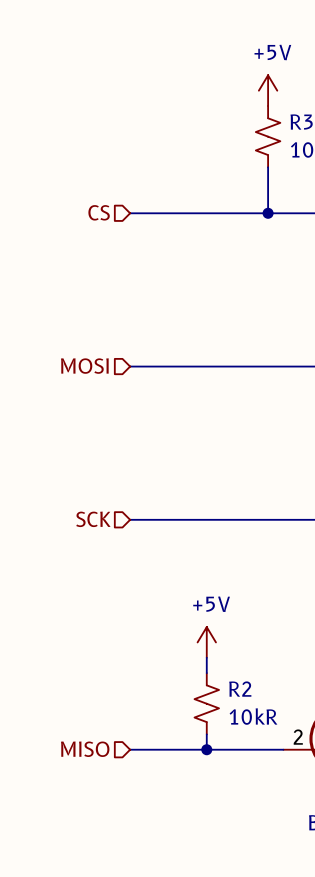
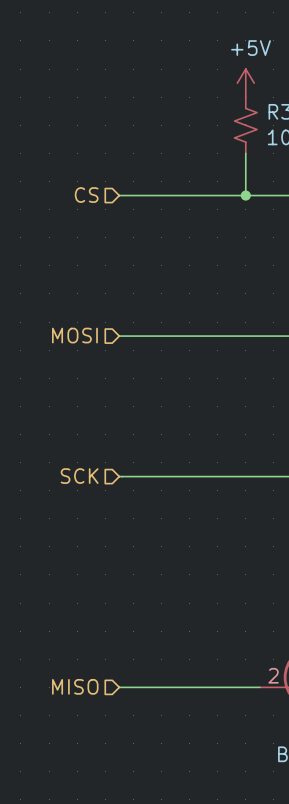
power symbol: +5V (206, 642) -> none
wire: (206, 657) (206, 673) -> none
R2: 10kR (206, 703) -> none
wire: (206, 734) (206, 749) -> none
junction: (206, 749) -> none

